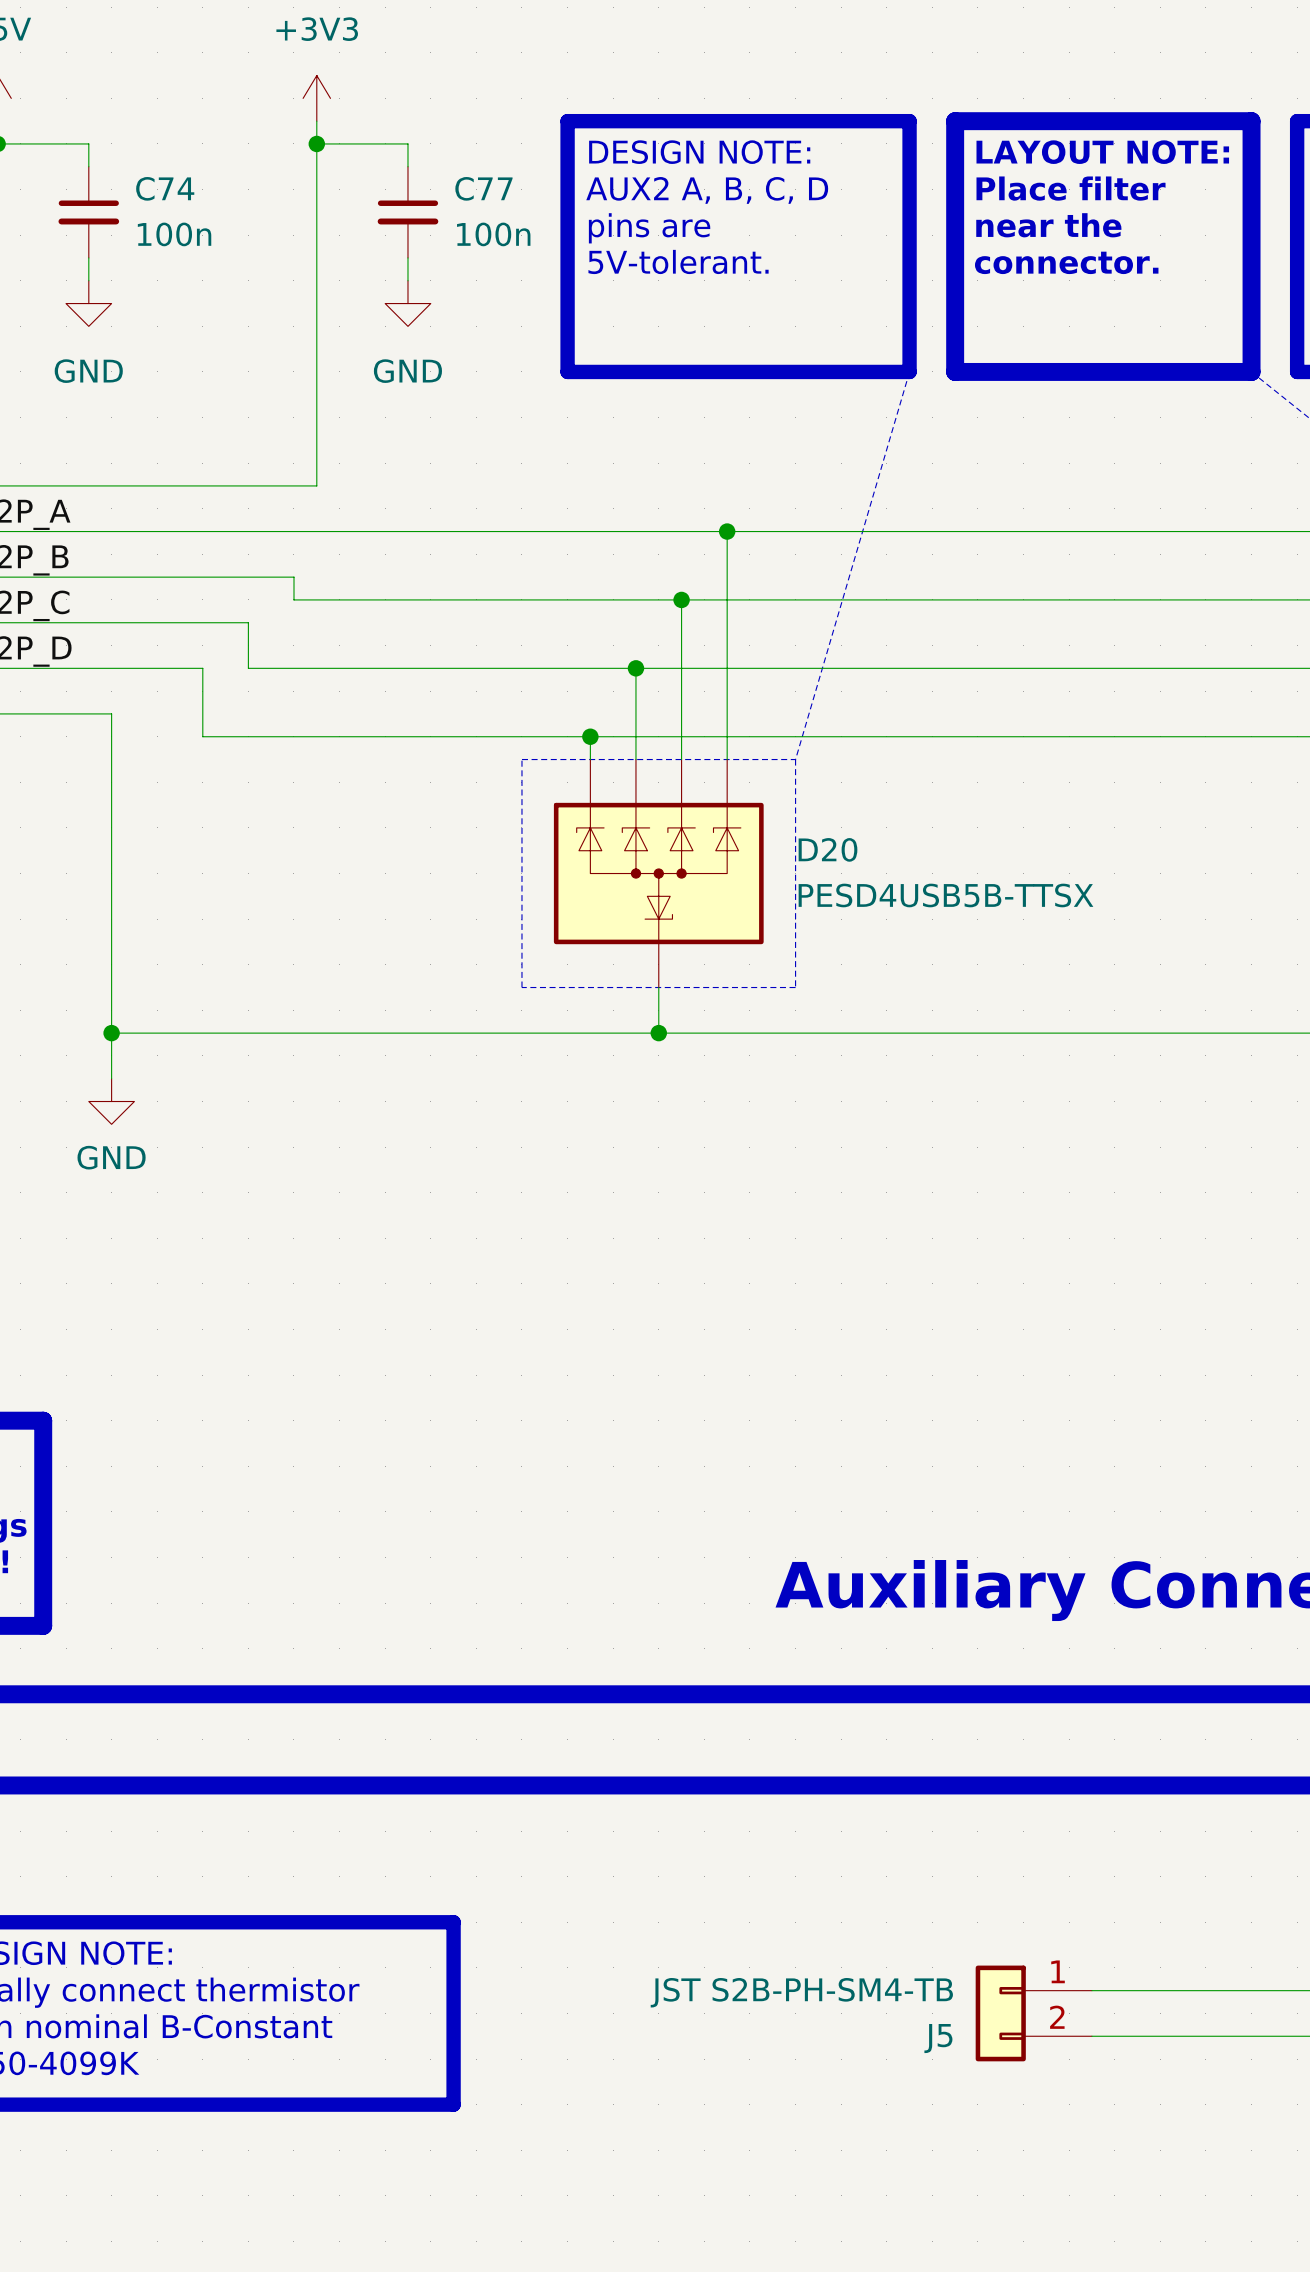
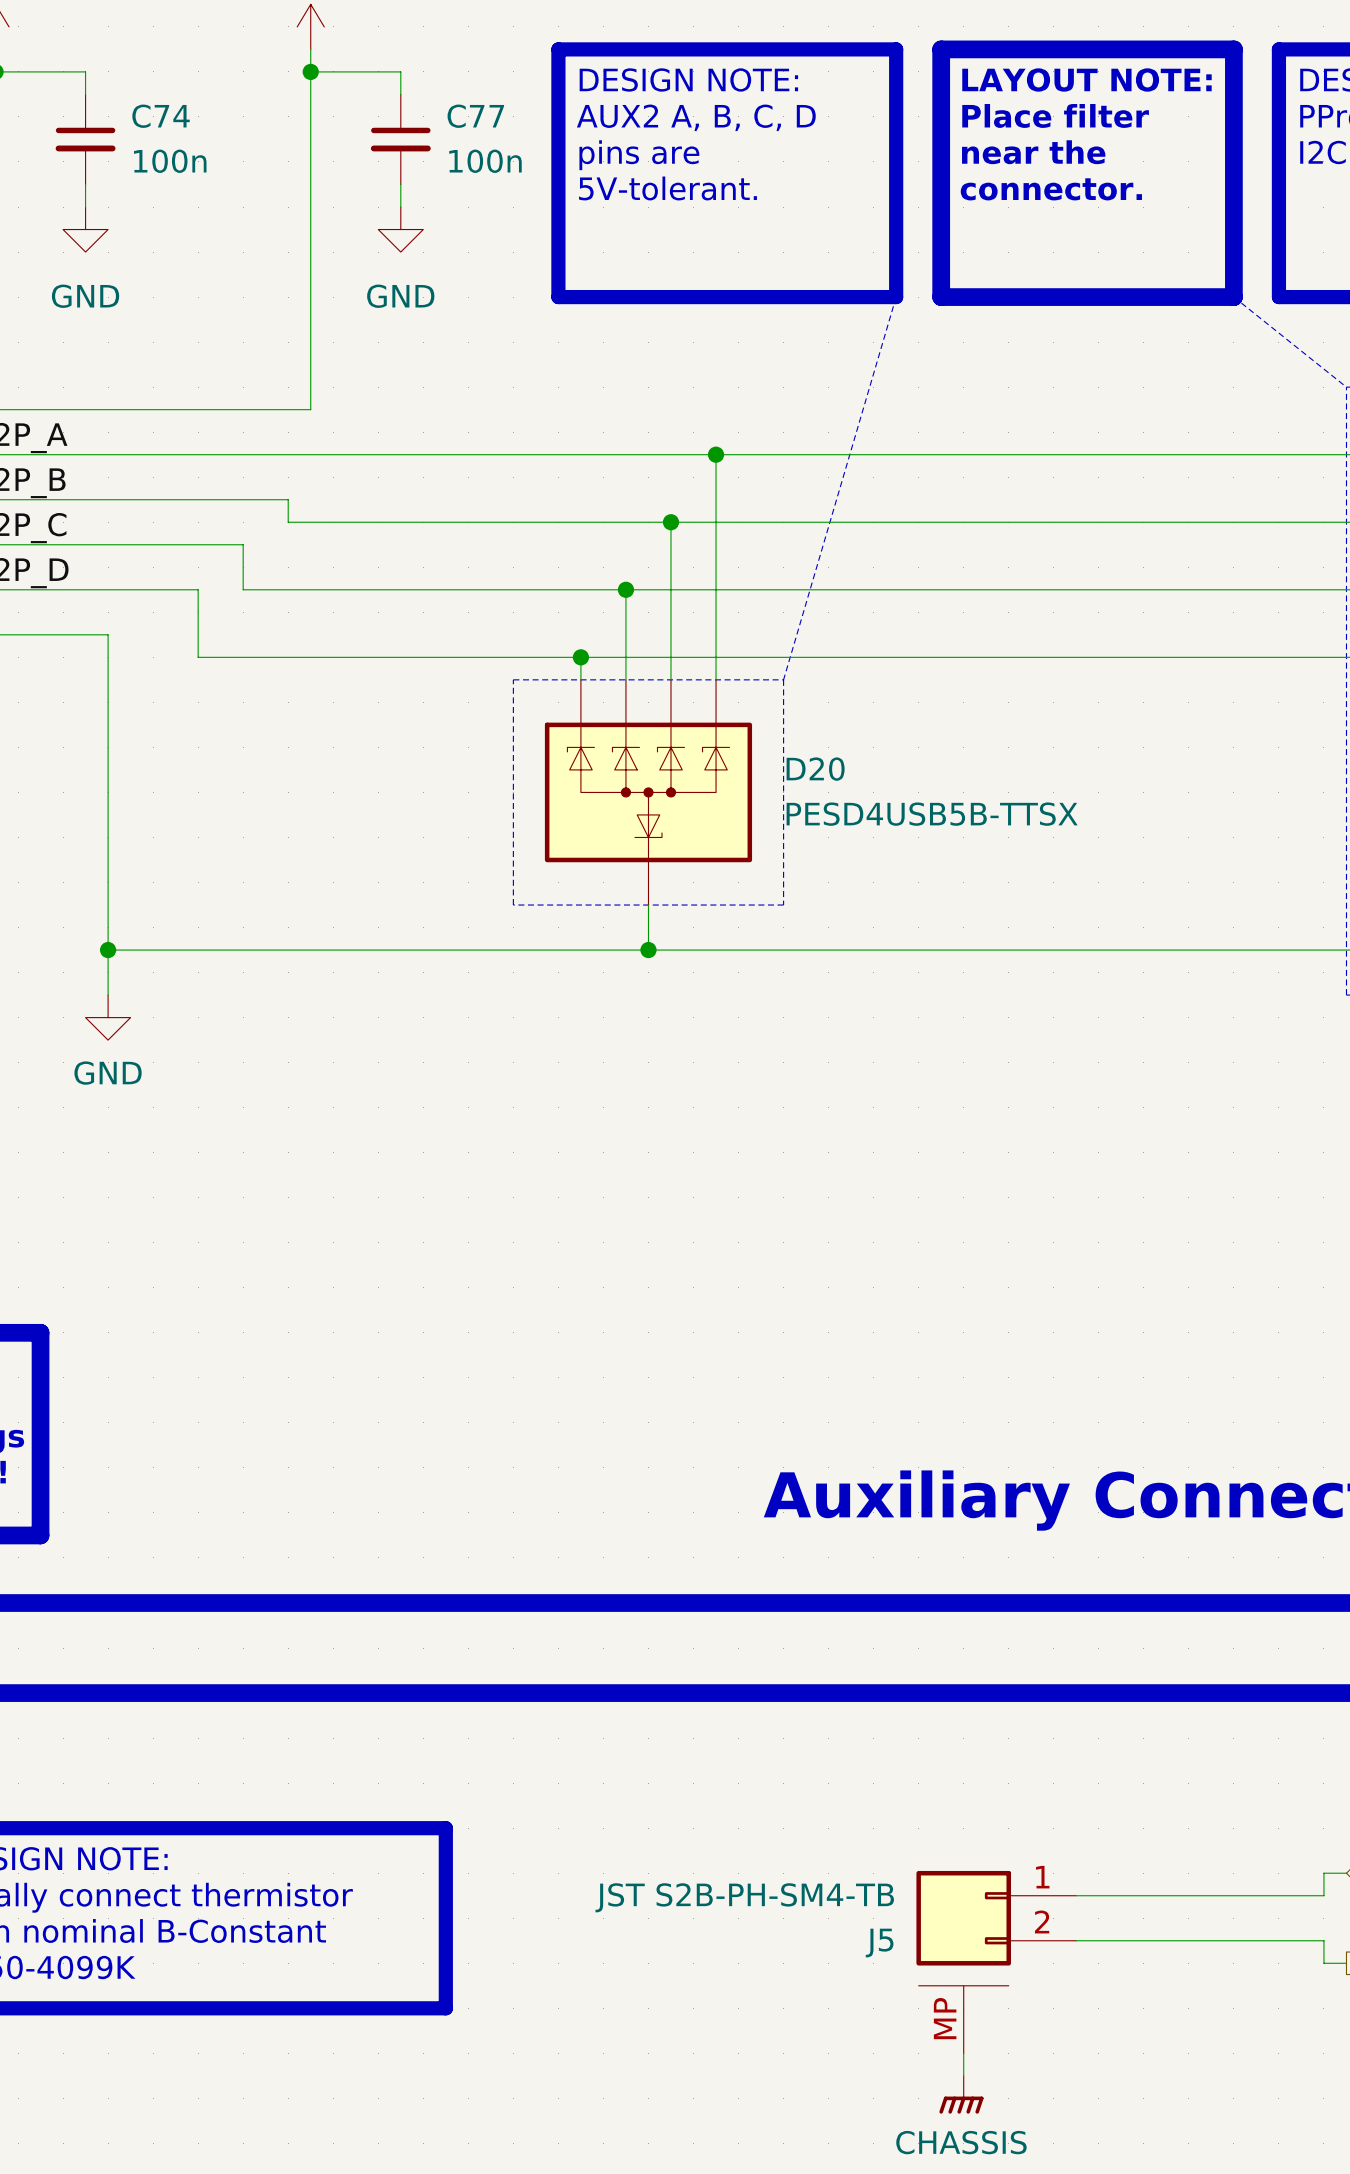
J5 symbol: [975, 1965, 1092, 2062] -> [916, 1870, 1077, 2054]
J5 value position: JST S2B-PH-SM4-TB (801, 1992) -> JST S2B-PH-SM4-TB (744, 1897)
J5 name position: J5 (938, 2038) -> J5 (879, 1943)
wire: none -> (963, 2053) (963, 2075)
power symbol: none -> CHASSIS (961, 2094)

